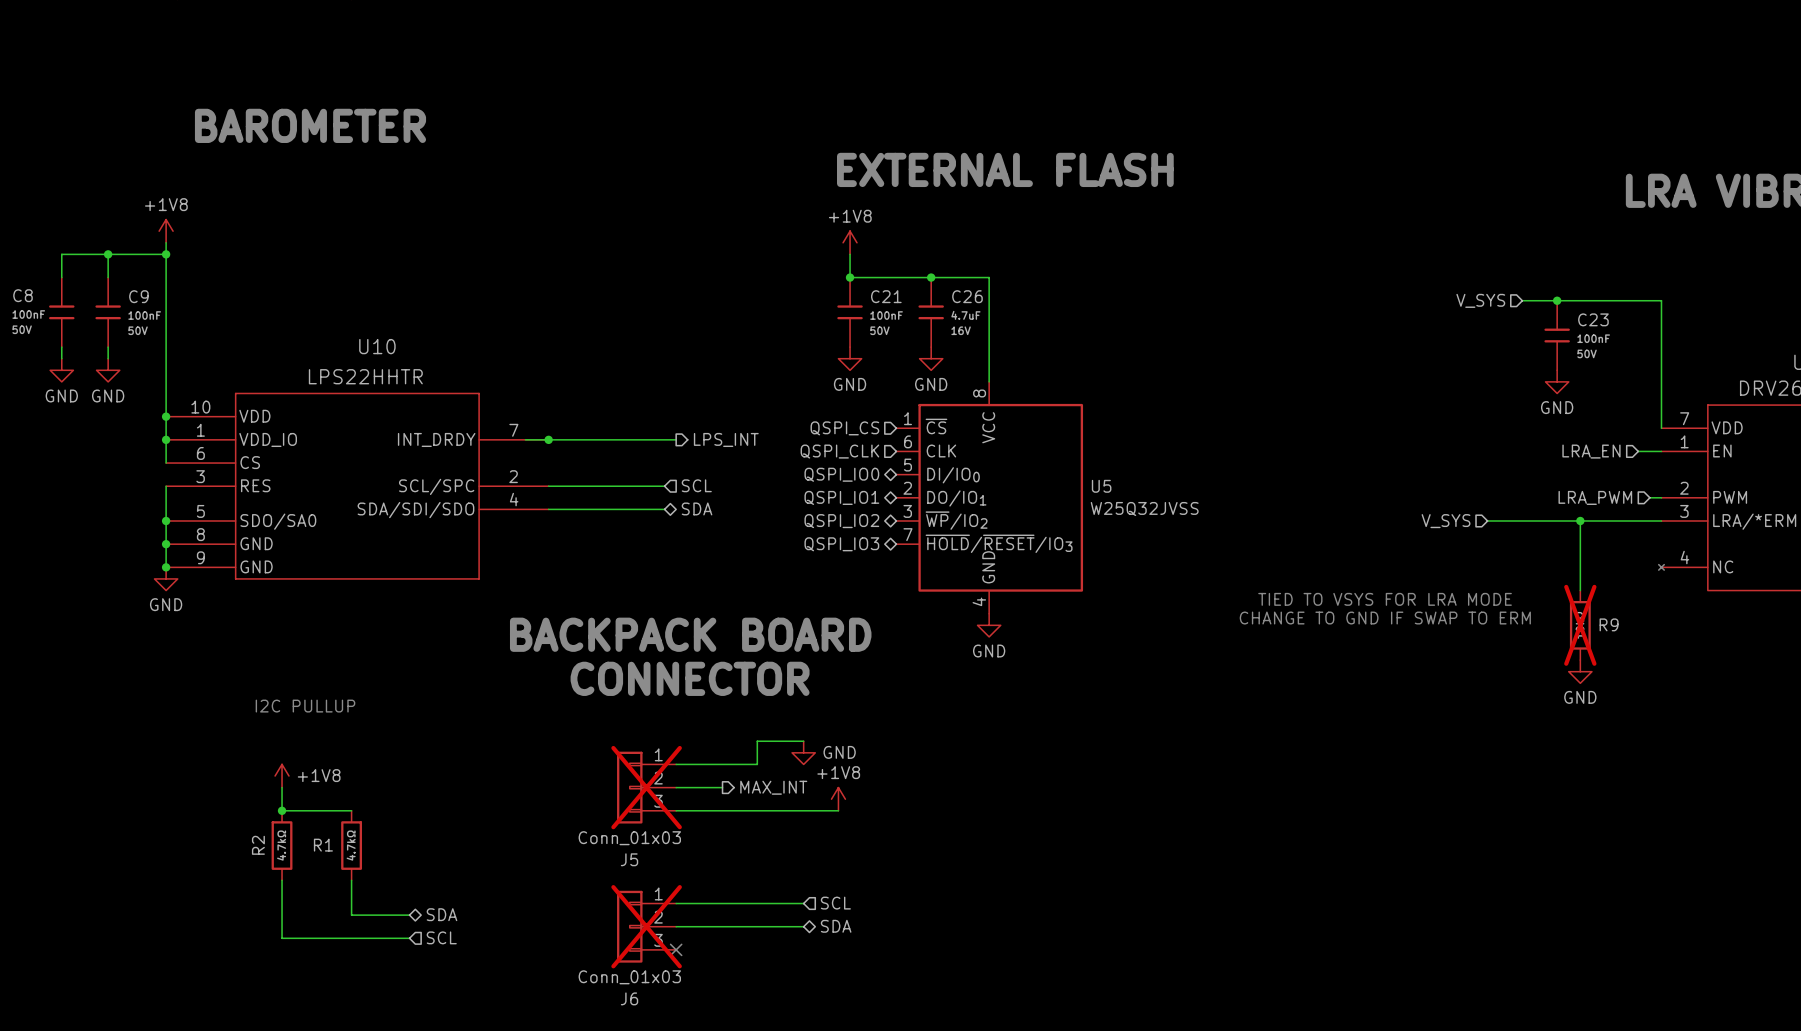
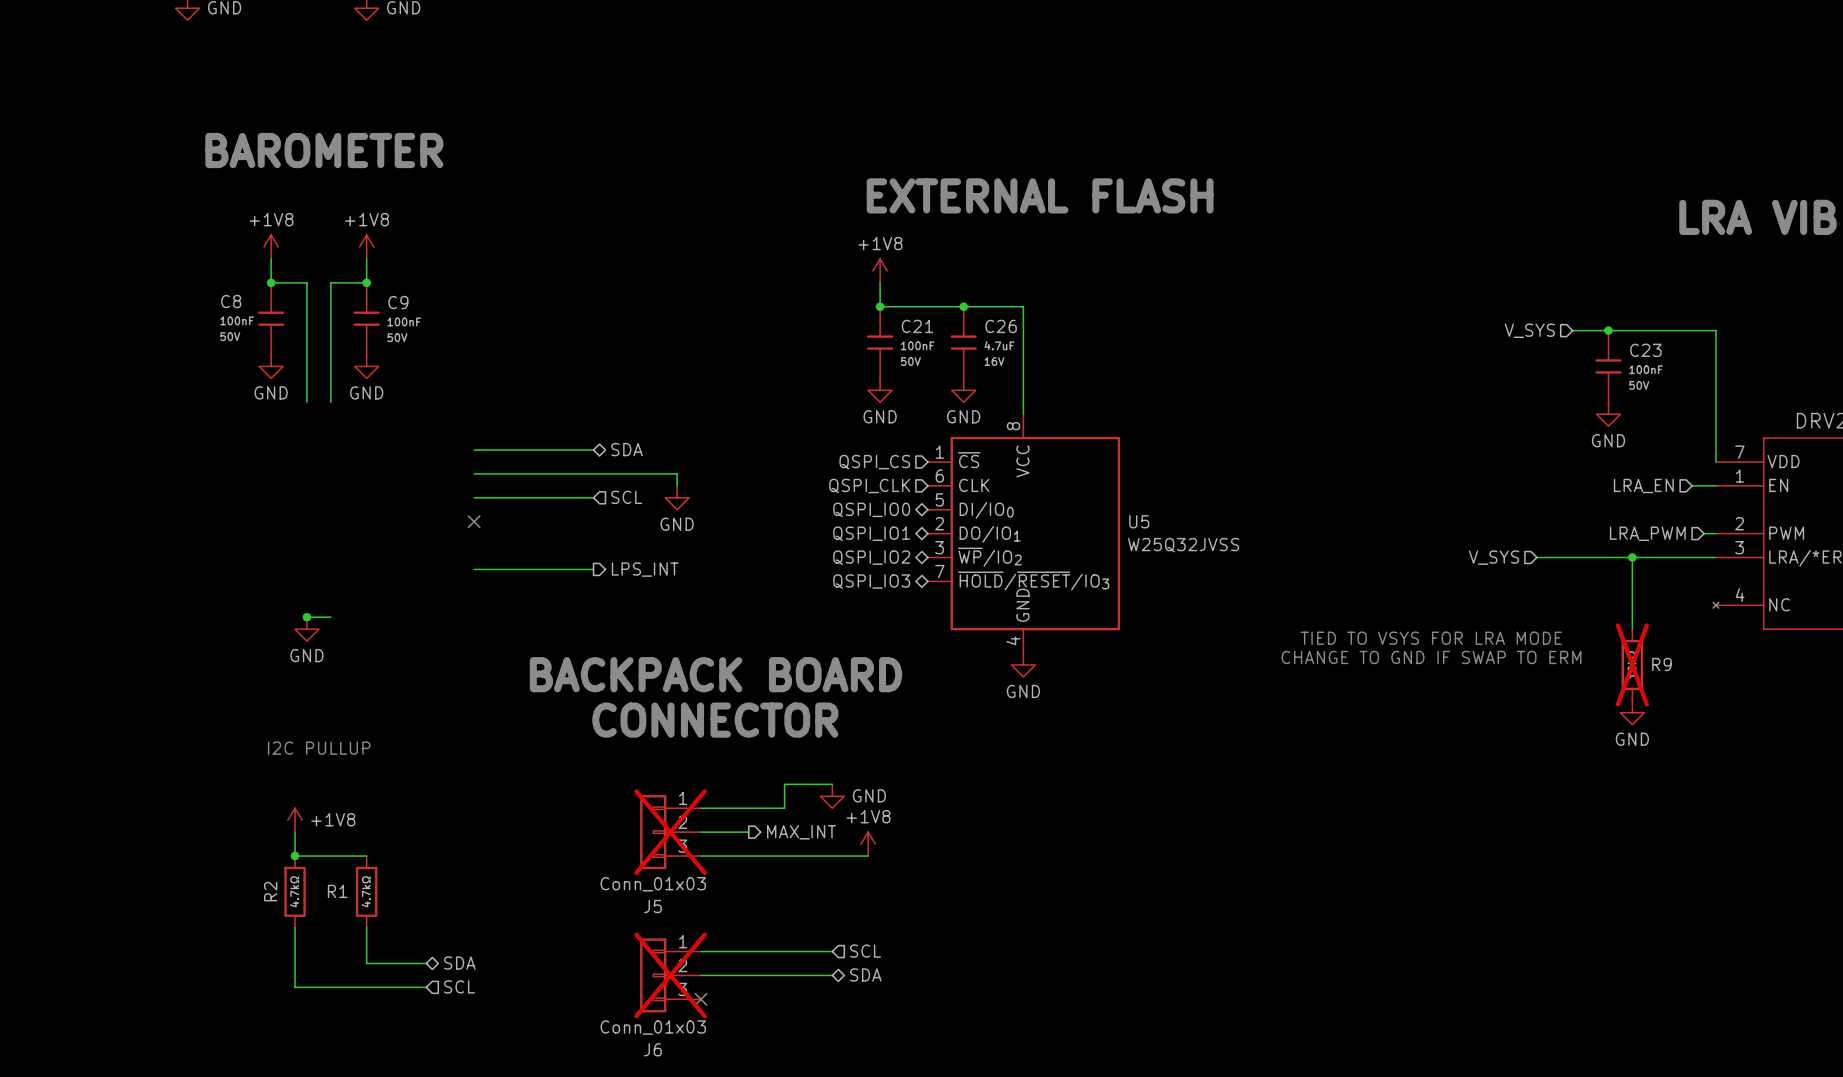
power symbol: none -> +1V8 (271, 247)
power symbol: none -> +1V8 (366, 247)
power symbol: +1V8 (166, 231) -> none
wire: none -> (271, 258) (271, 282) (306, 282) (306, 402)
wire: none -> (366, 258) (366, 282) (330, 282) (330, 402)
wire: (166, 242) (166, 463) -> none
wire: (108, 254) (108, 277) -> none
junction: (108, 254) -> none
wire: (166, 254) (61, 254) (61, 277) -> none
junction: (166, 254) -> none
junction: none -> (271, 282)
junction: none -> (366, 282)
C8 position: (61, 312) -> (271, 318)
C9 position: (108, 312) -> (366, 318)
power symbol: none -> GND (271, 366)
power symbol: none -> GND (366, 366)
wire: (61, 347) (61, 358) -> none
wire: (108, 347) (108, 358) -> none
power symbol: GND (61, 370) -> none
power symbol: GND (108, 370) -> none
junction: (166, 416) -> none
wire: none -> (474, 450) (593, 450)
junction: (166, 439) -> none
junction: (548, 439) -> none
wire: (652, 439) (676, 439) -> (677, 473) (677, 485)
hierarchical label position: LPS_INT (726, 439) -> LPS_INT (645, 569)
power symbol: none -> GND (677, 497)
hierarchical label position: SCL (696, 485) -> SCL (626, 497)
wire: (166, 486) (166, 567) -> none
U10: LPS22HHTR (357, 486) -> none
no-connect mark: none -> (474, 521)
wire: (548, 486) (664, 486) -> (474, 497) (593, 497)
hierarchical label position: SDA (697, 508) -> SDA (626, 449)
wire: (548, 509) (664, 509) -> (474, 569) (593, 569)
junction: (166, 520) -> none
junction: (166, 544) -> none
junction: (166, 567) -> none
power symbol position: GND (166, 578) -> GND (306, 629)
junction: none -> (306, 617)

